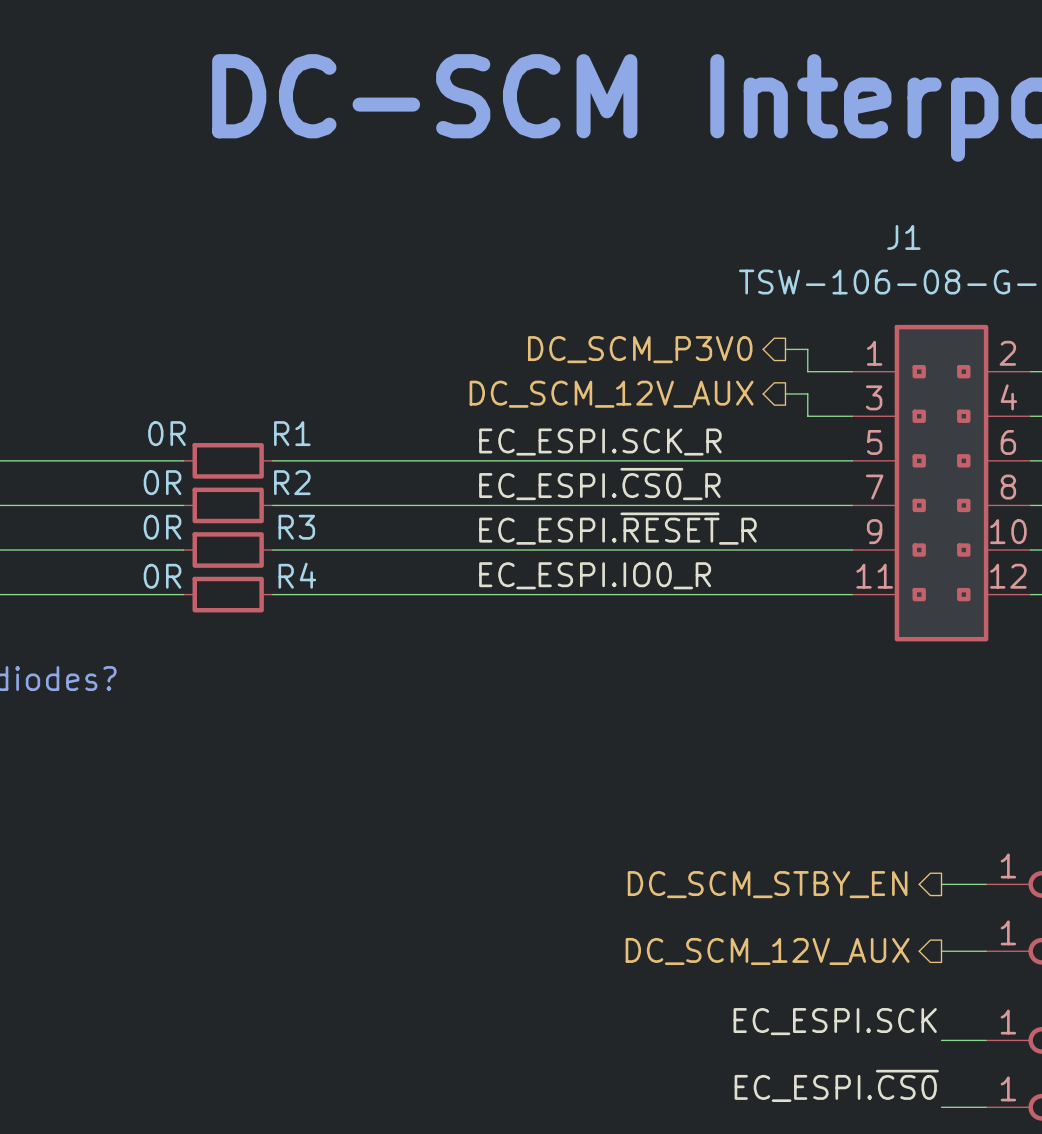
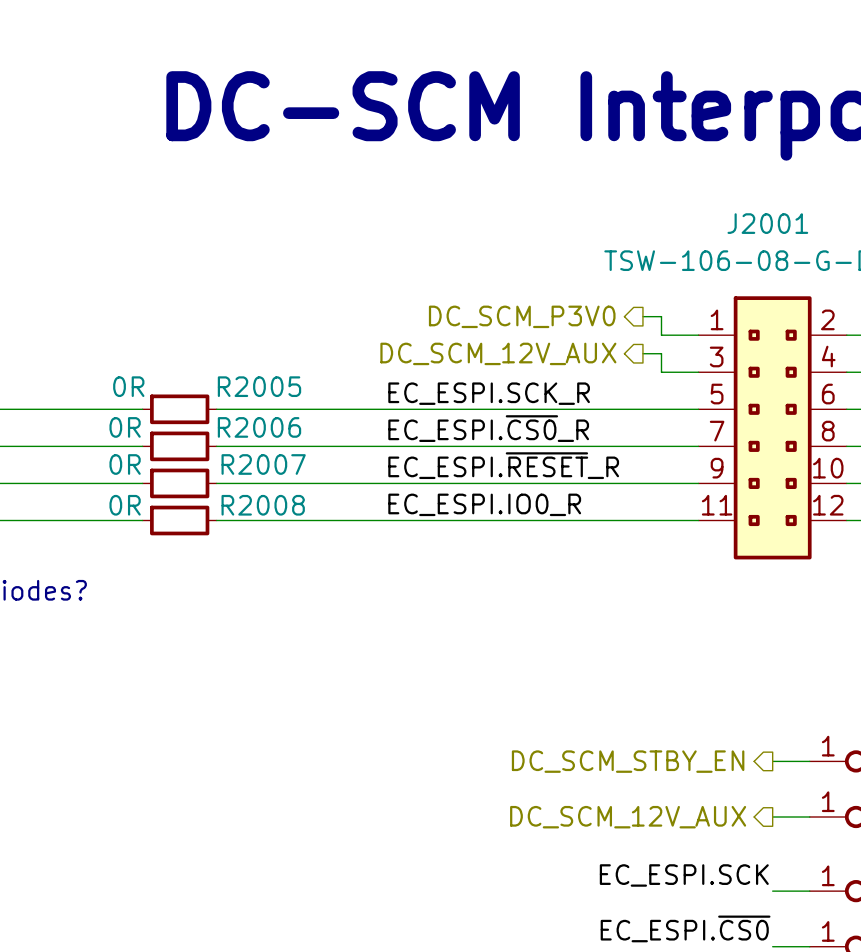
J1 name: J1 (903, 237) -> J2001 (767, 223)
R1 name: R1 (292, 433) -> R2005 (259, 386)
R2 name: R2 (292, 482) -> R2006 (259, 427)
R3 name: R3 (296, 527) -> R2007 (263, 464)
R4 name: R4 (297, 575) -> R2008 (263, 505)

